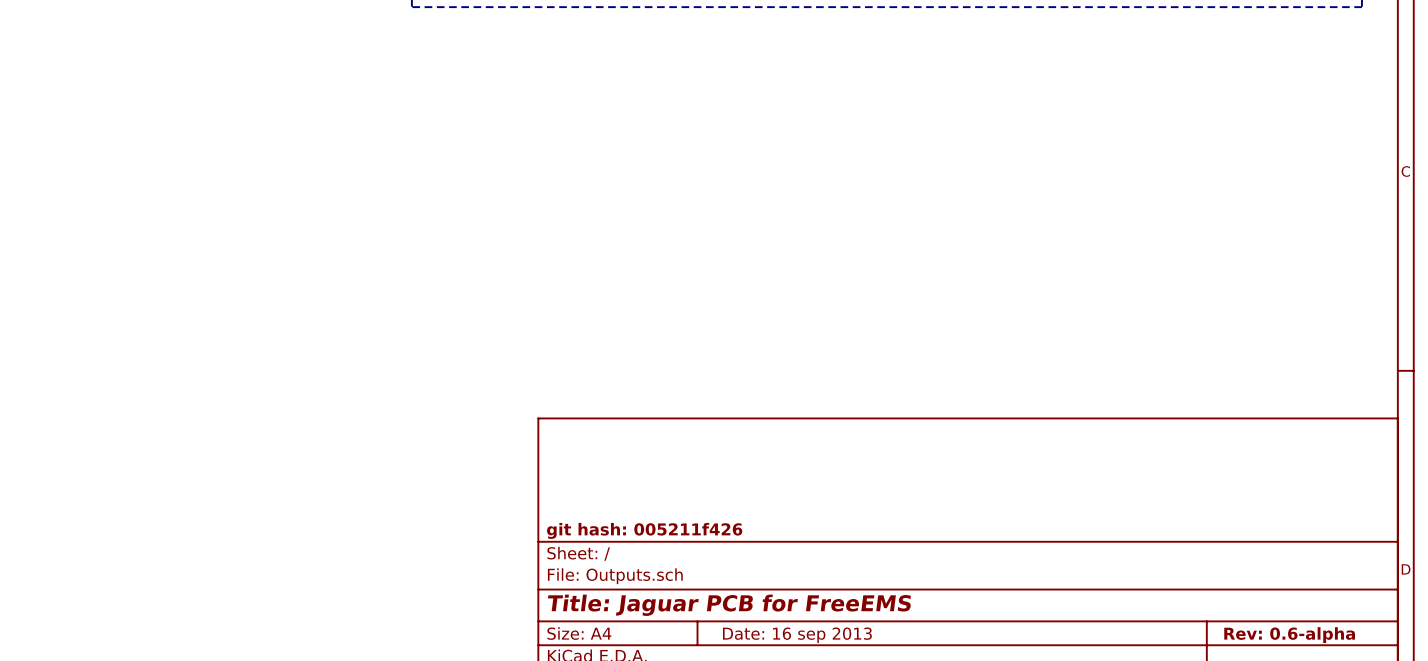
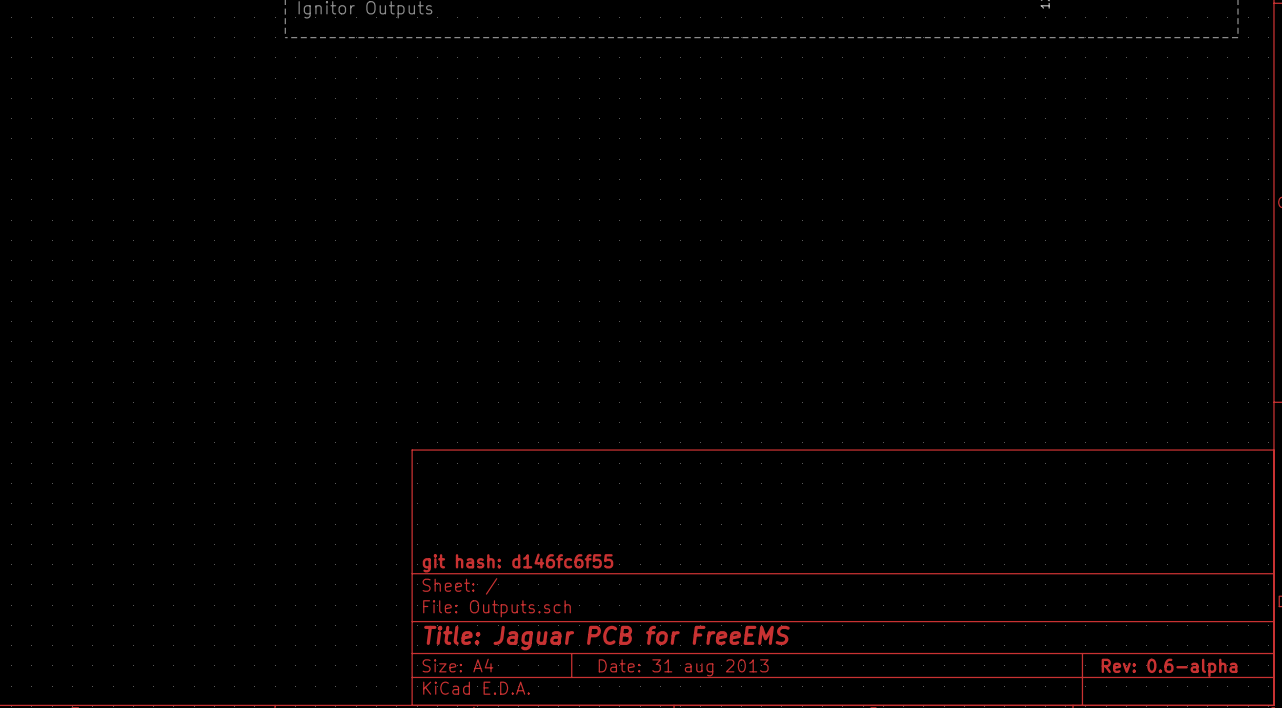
title block: git hash: 005211f426 (644, 530) -> git hash: d146fc6f55 (518, 563)
title block: Date: 16 sep 2013 (797, 635) -> Date: 31 aug 2013 (683, 667)

